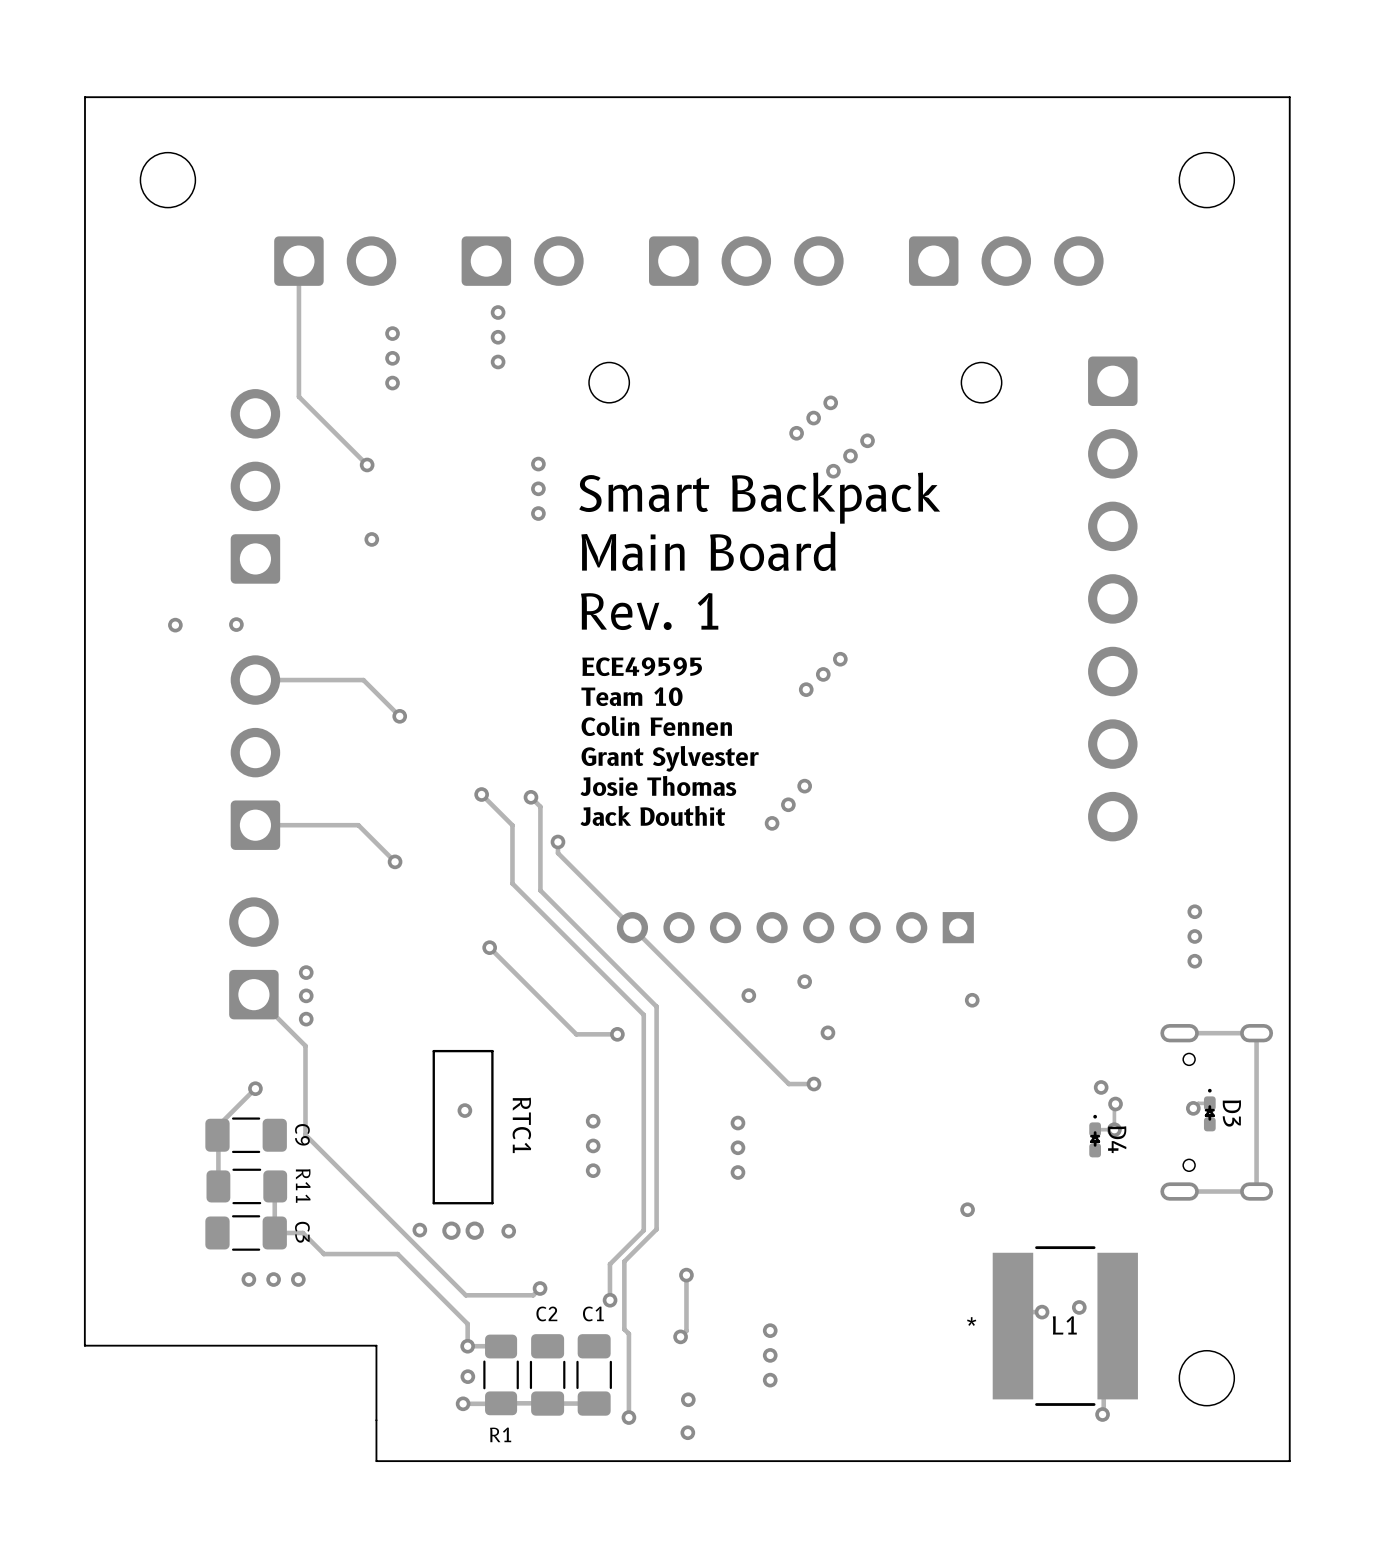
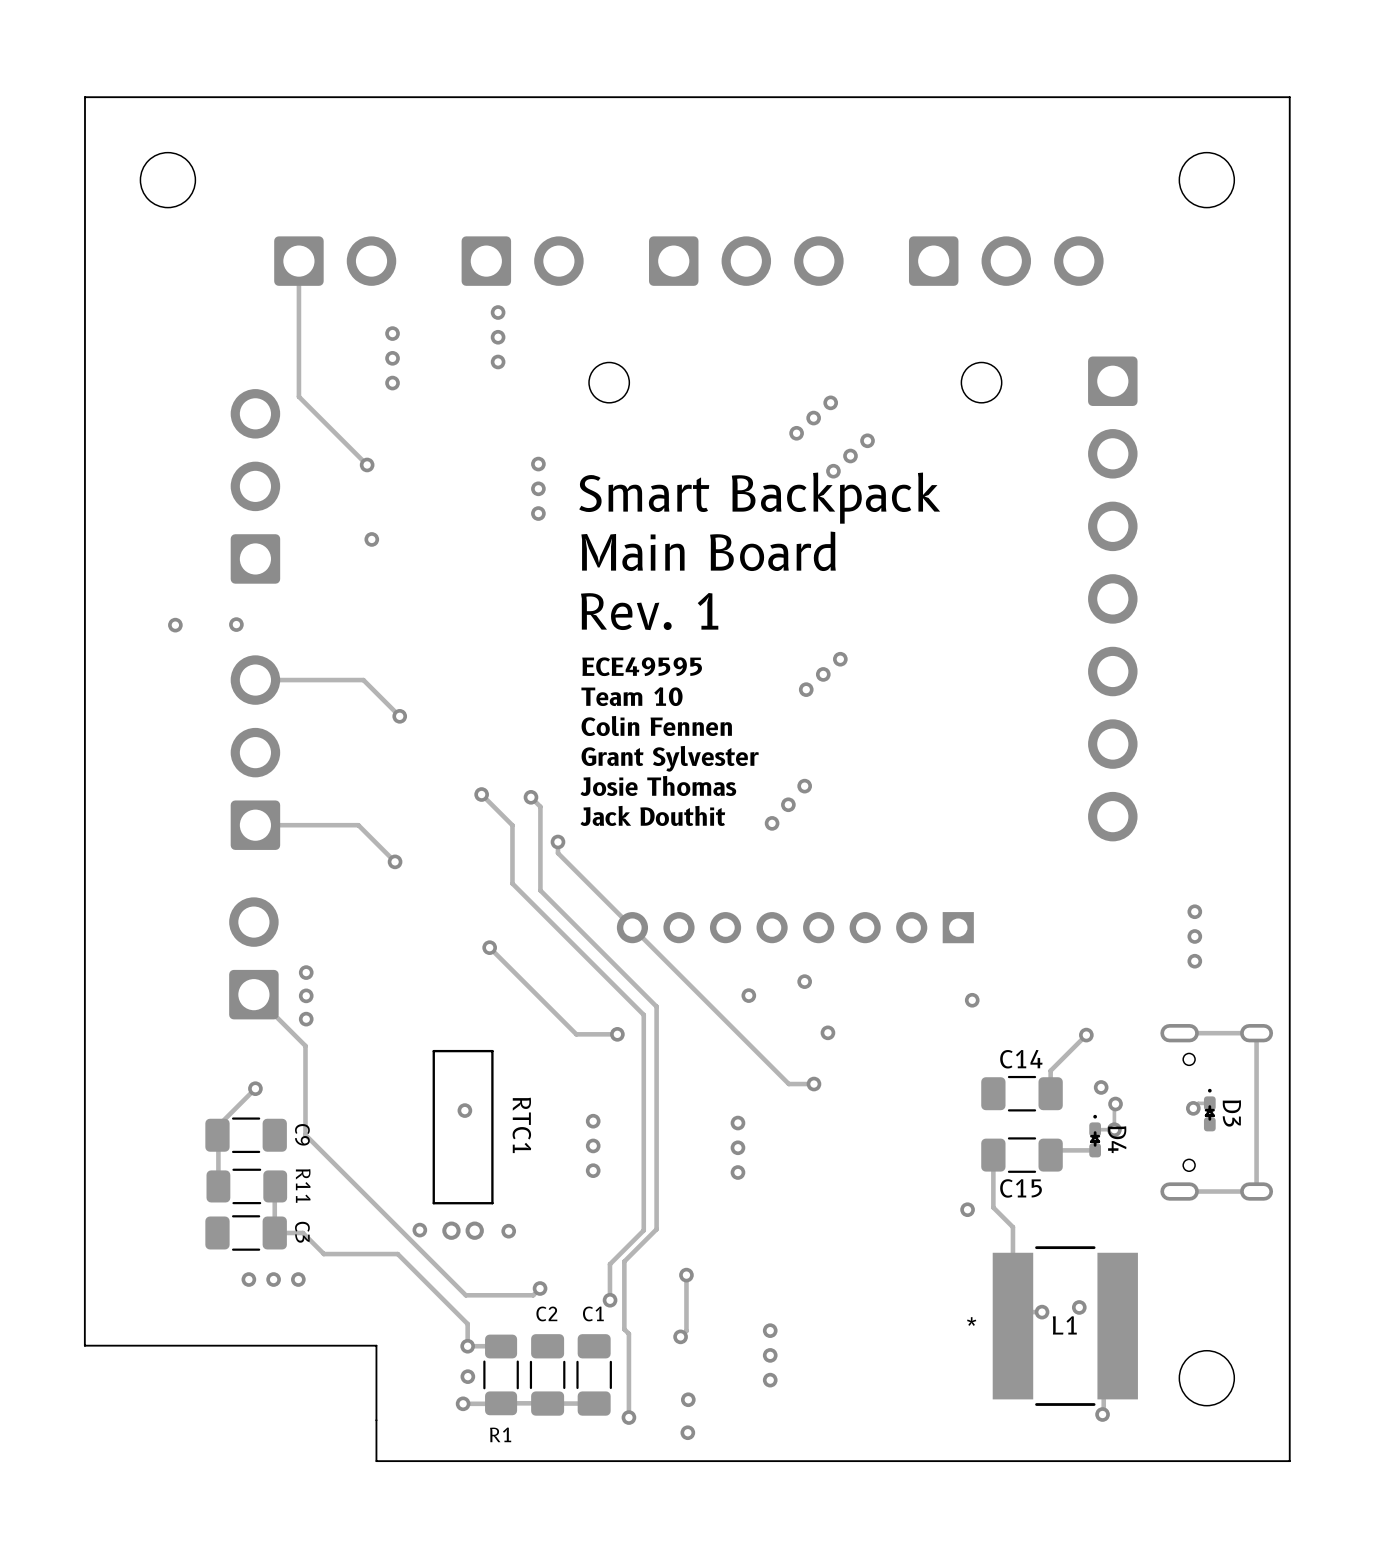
track: none -> (1086, 1035) (1050, 1070) (1050, 1093)
via: none -> (1086, 1035)
C14: none -> (1022, 1093)
track: none -> (1095, 1150) (1055, 1150) (1050, 1155)
track: none -> (993, 1155) (993, 1207) (1012, 1227) (1012, 1326)
C15: none -> (1022, 1155)

